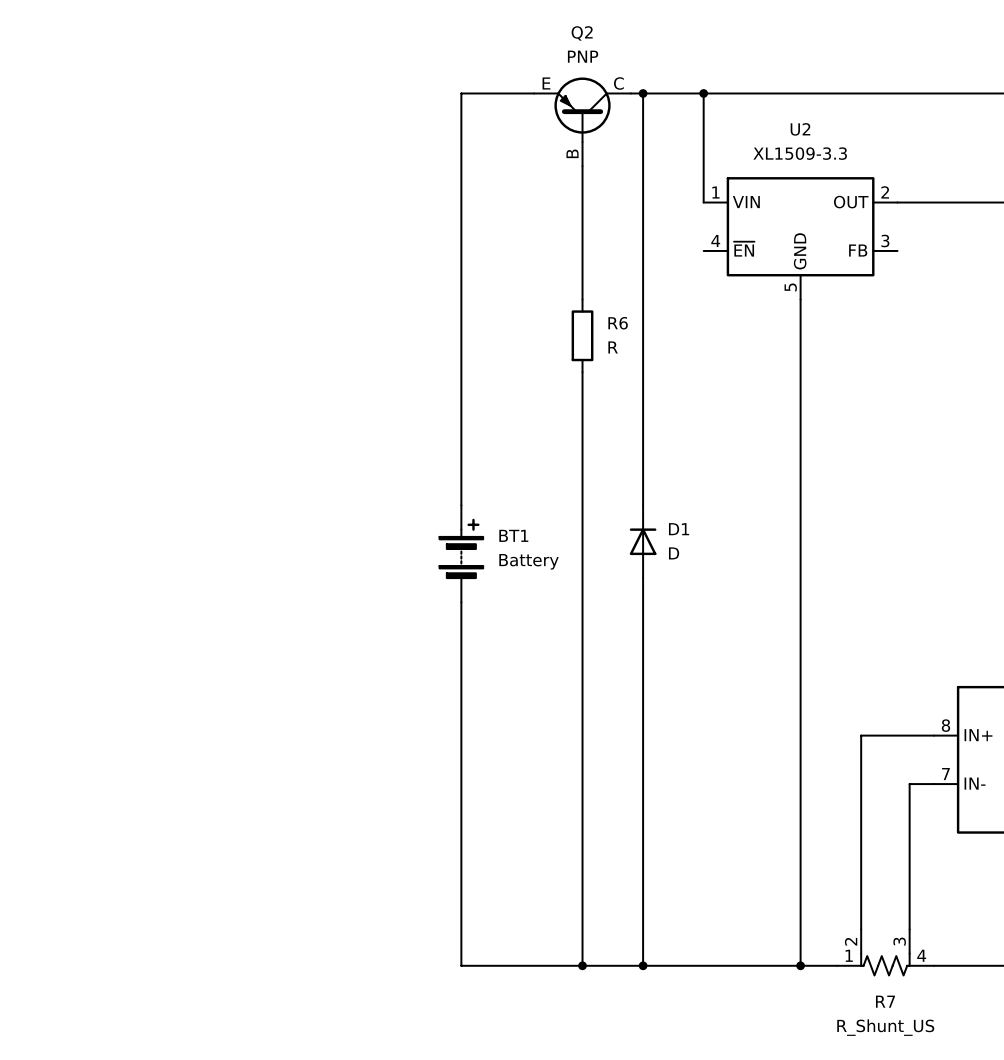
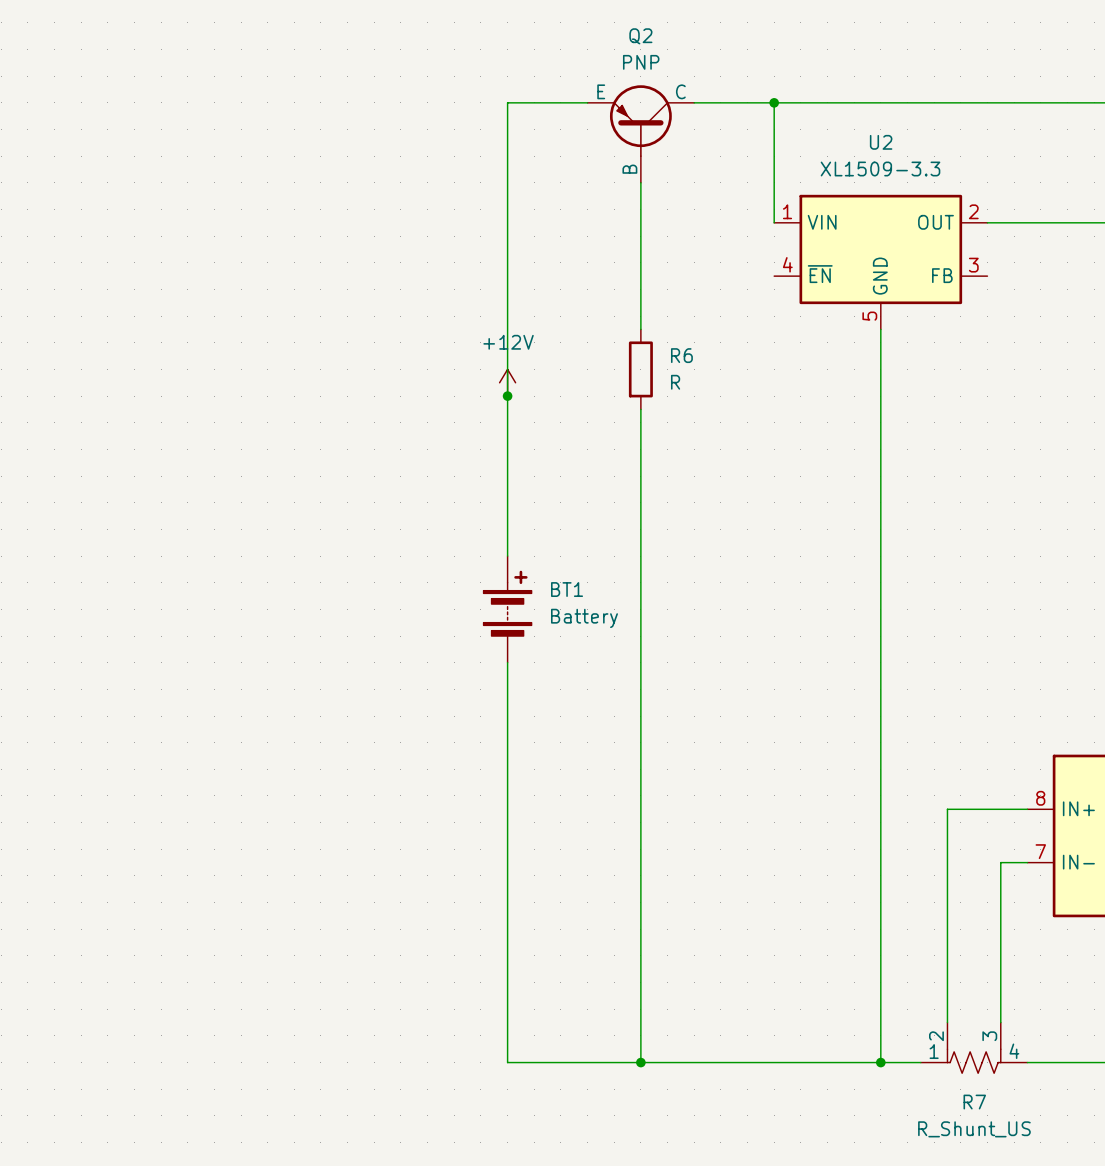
wire: (643, 93) (643, 505) -> none
junction: (643, 93) -> none
power symbol: none -> +12V (507, 382)
junction: none -> (507, 396)
D1: D (643, 541) -> none
wire: (643, 578) (643, 965) -> none
junction: (643, 965) -> none

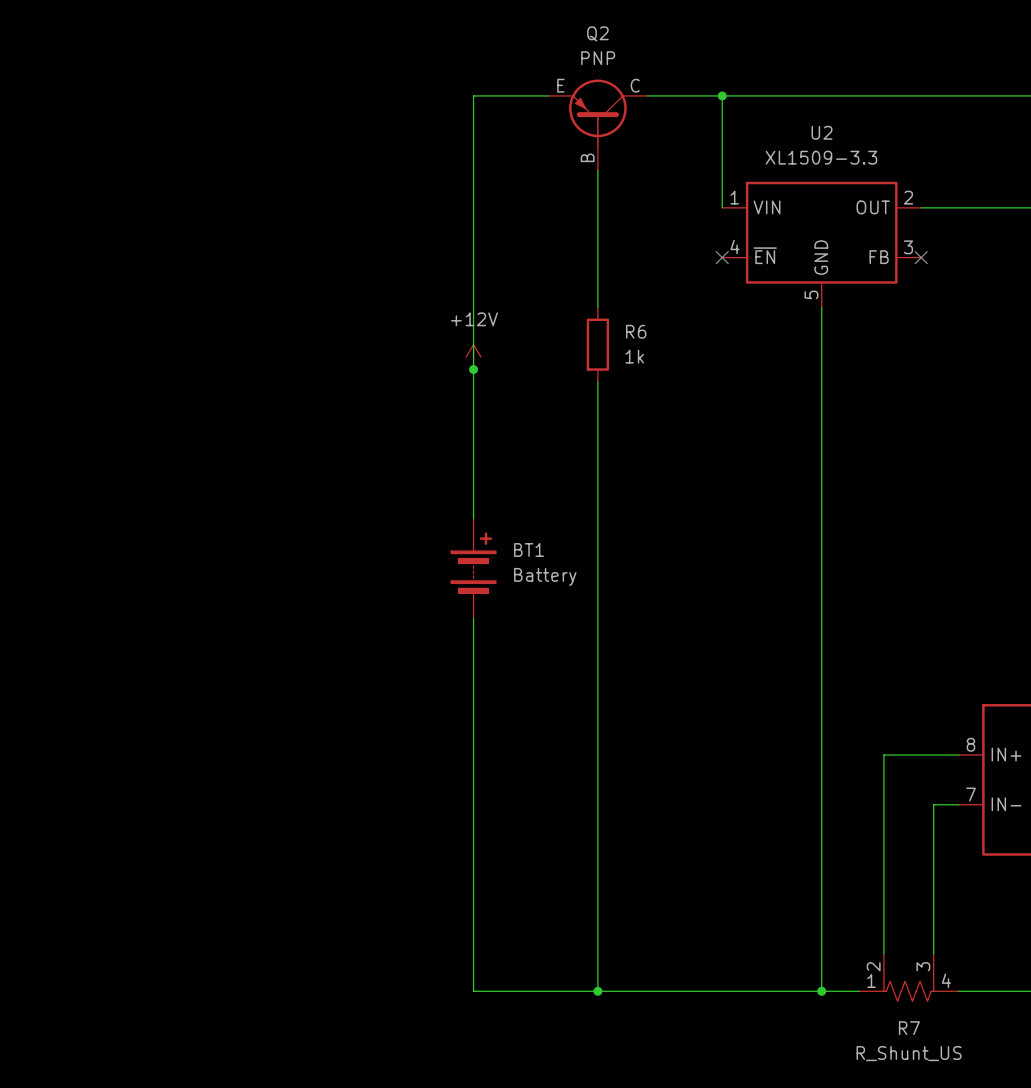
no-connect mark: none -> (722, 257)
no-connect mark: none -> (921, 257)
R6 value: R (675, 382) -> 1k (634, 356)

